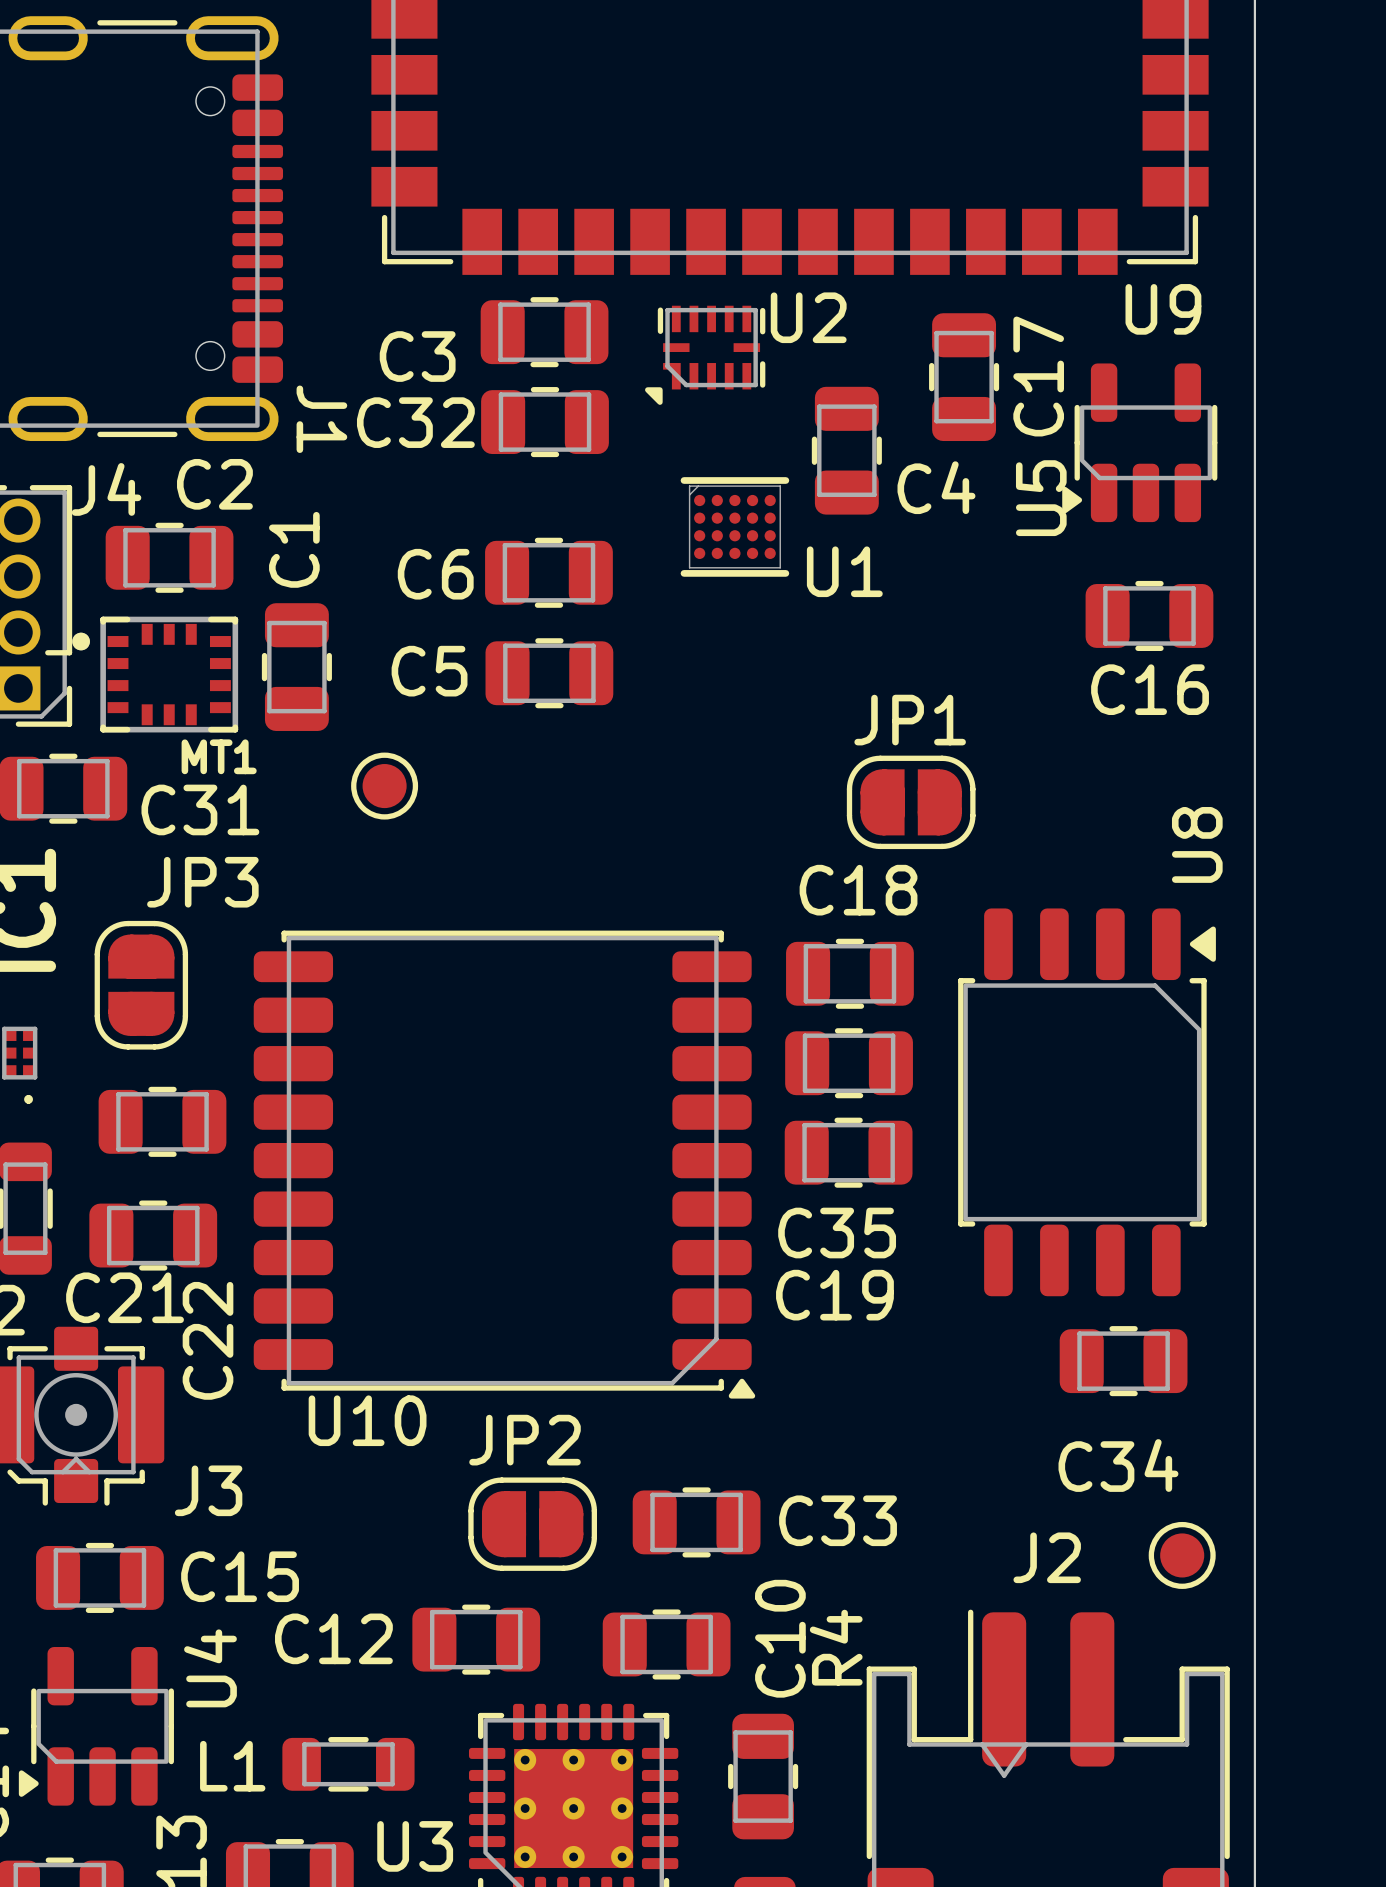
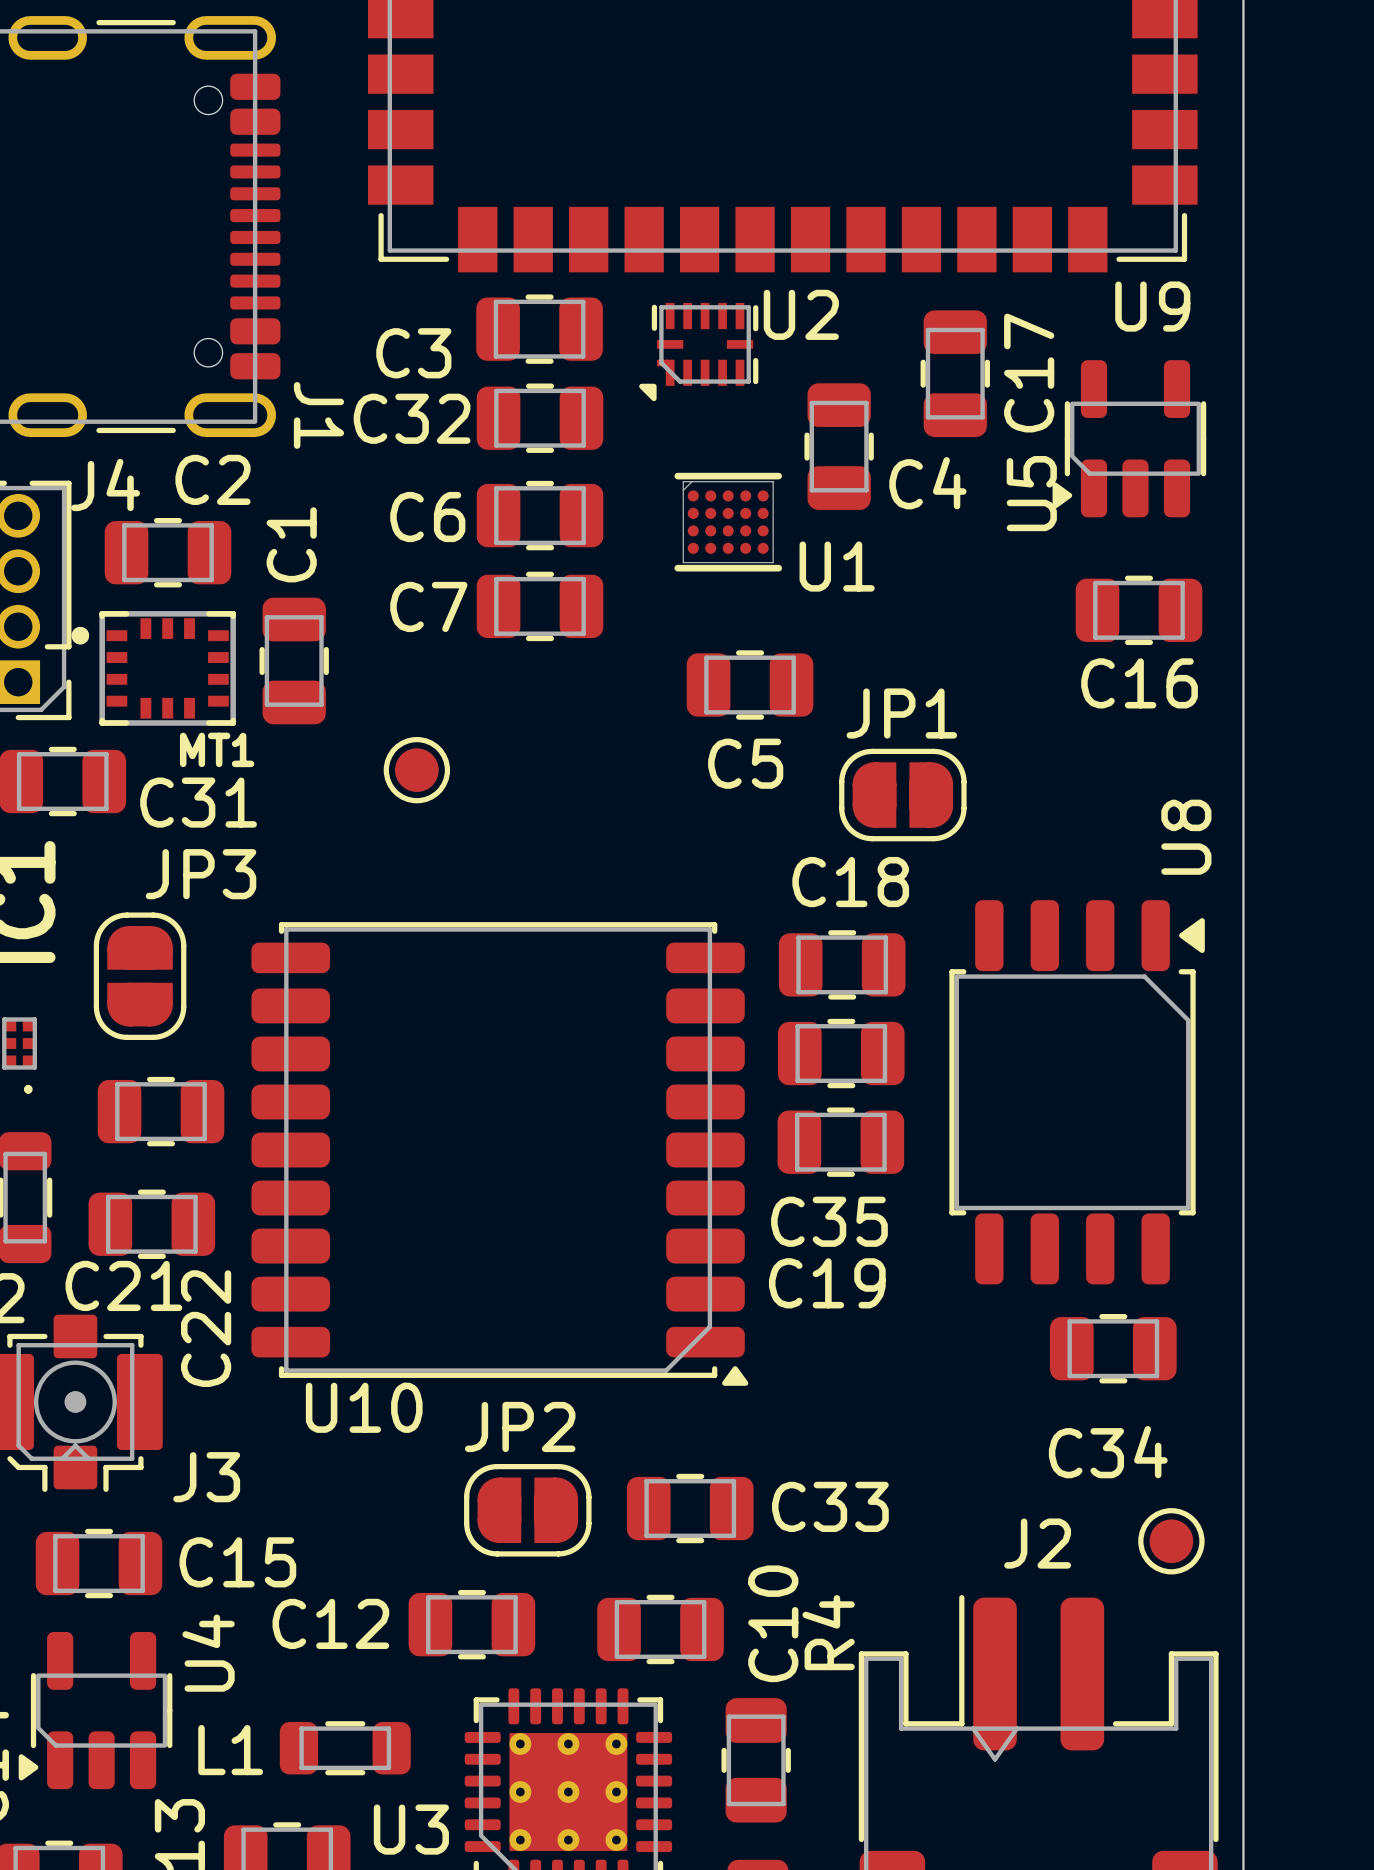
C6 position: (548, 572) -> (540, 515)
C7: none -> (540, 606)
C5 name position: C5 (429, 671) -> C5 (745, 763)
C5 position: (549, 673) -> (750, 685)
part position: (384, 786) -> (416, 770)

